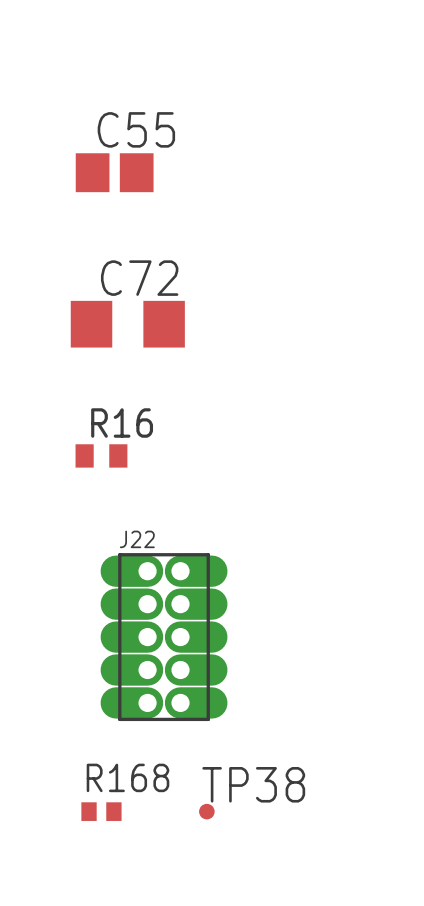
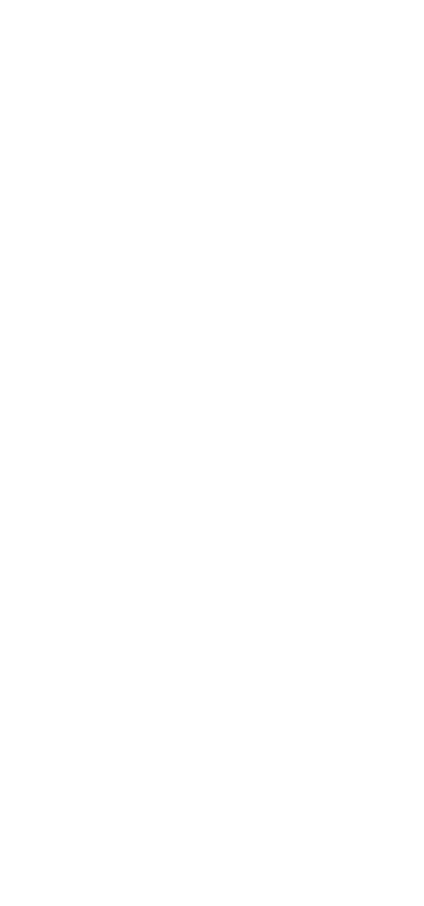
C55: (114, 172) -> none
C72: (127, 324) -> none
R16: (101, 455) -> none
J22: (164, 637) -> none
R168: (101, 811) -> none
TP38: (206, 811) -> none

